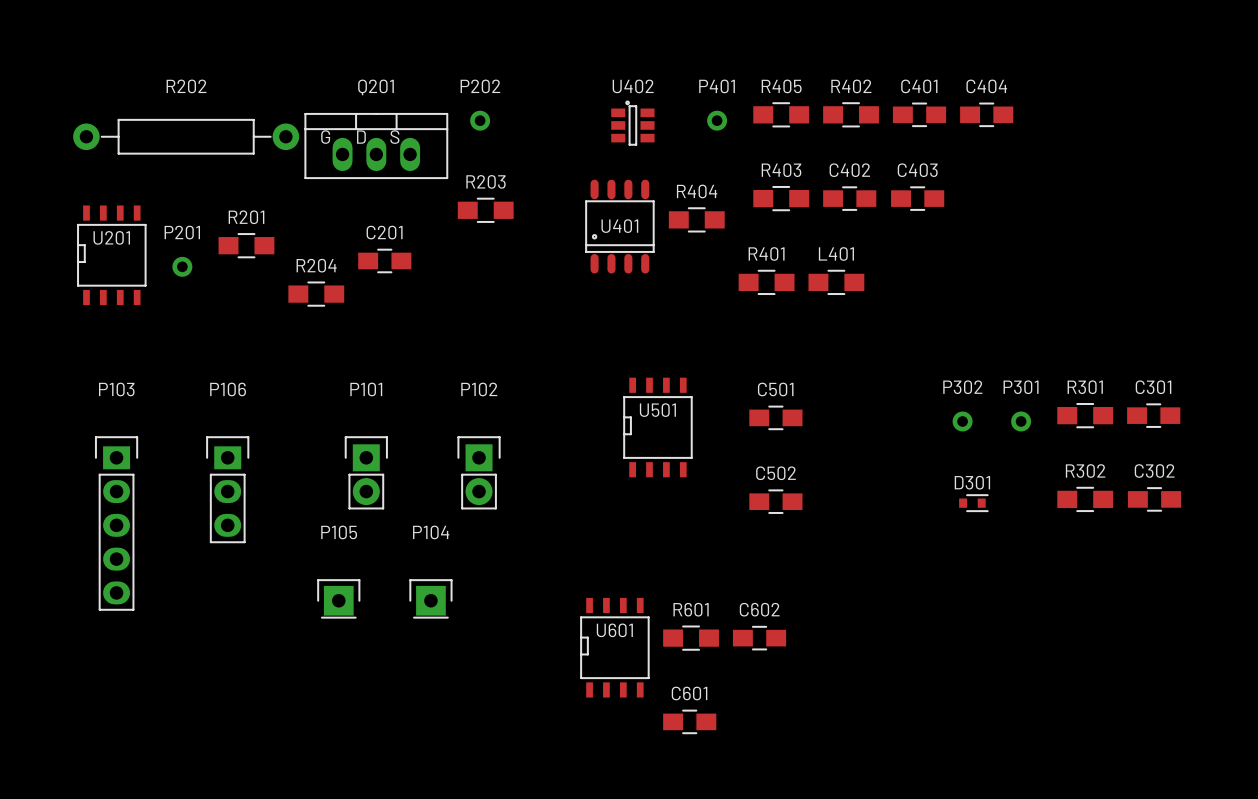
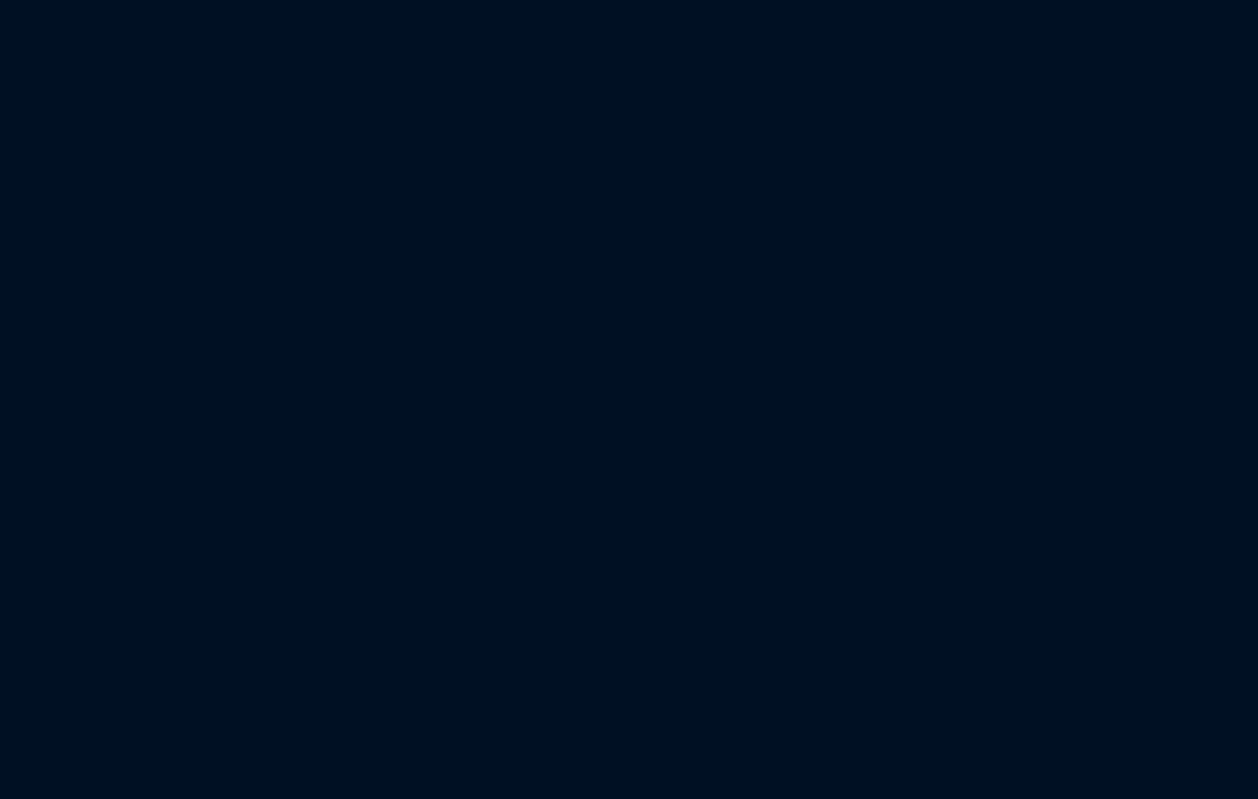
R405: (781, 114) -> none
R402: (851, 114) -> none
C401: (919, 114) -> none
C404: (986, 114) -> none
P202: (480, 120) -> none
P401: (717, 120) -> none
U402: (632, 123) -> none
R202: (186, 136) -> none
Q201: (376, 146) -> none
R403: (781, 198) -> none
C402: (849, 198) -> none
C403: (917, 198) -> none
R203: (485, 210) -> none
R404: (696, 219) -> none
U401: (619, 226) -> none
R201: (246, 245) -> none
U201: (111, 255) -> none
C201: (384, 260) -> none
P201: (182, 266) -> none
R401: (766, 282) -> none
L401: (836, 282) -> none
R204: (316, 294) -> none
R301: (1085, 415) -> none
C301: (1153, 415) -> none
C501: (775, 417) -> none
P302: (962, 421) -> none
P301: (1021, 421) -> none
U501: (657, 427) -> none
P101: (366, 472) -> none
P102: (479, 472) -> none
P106: (227, 489) -> none
R302: (1085, 499) -> none
C302: (1154, 499) -> none
C502: (775, 501) -> none
D301: (973, 503) -> none
P103: (116, 523) -> none
P105: (338, 598) -> none
P104: (430, 598) -> none
R601: (691, 638) -> none
C602: (759, 638) -> none
U601: (614, 647) -> none
C601: (689, 721) -> none

